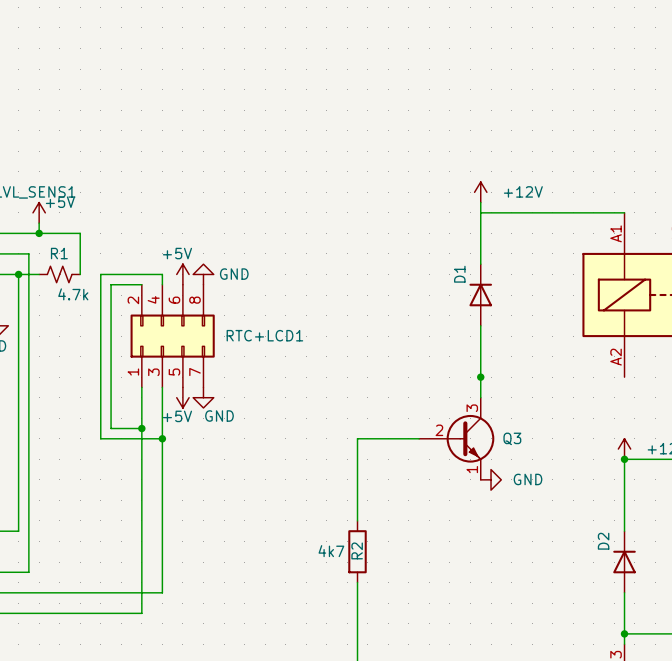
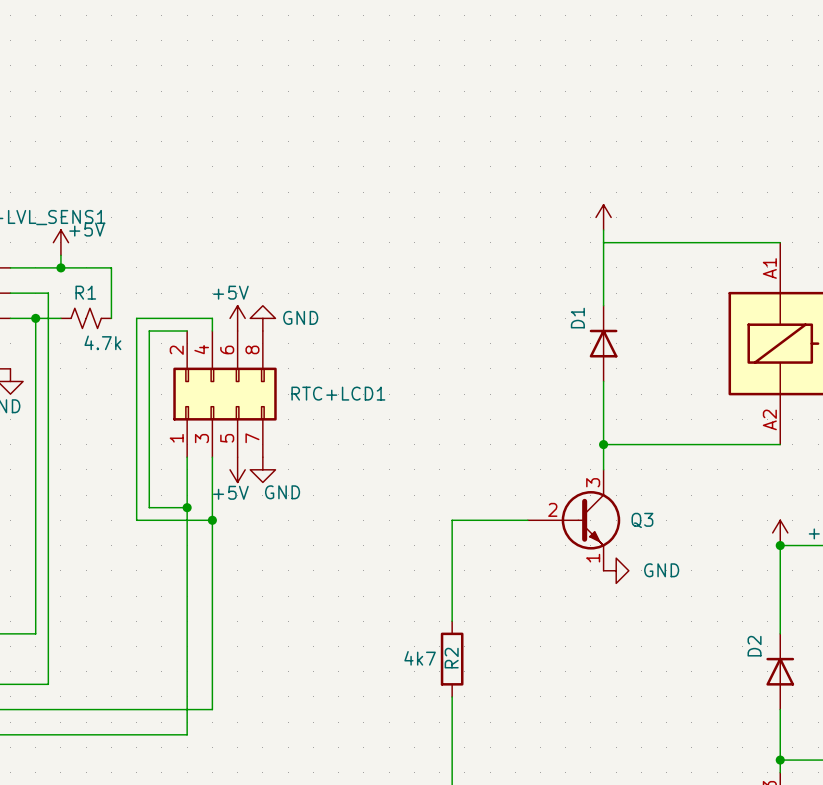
power symbol text: +12V (523, 191) -> none
wire: none -> (603, 444) (780, 444)

